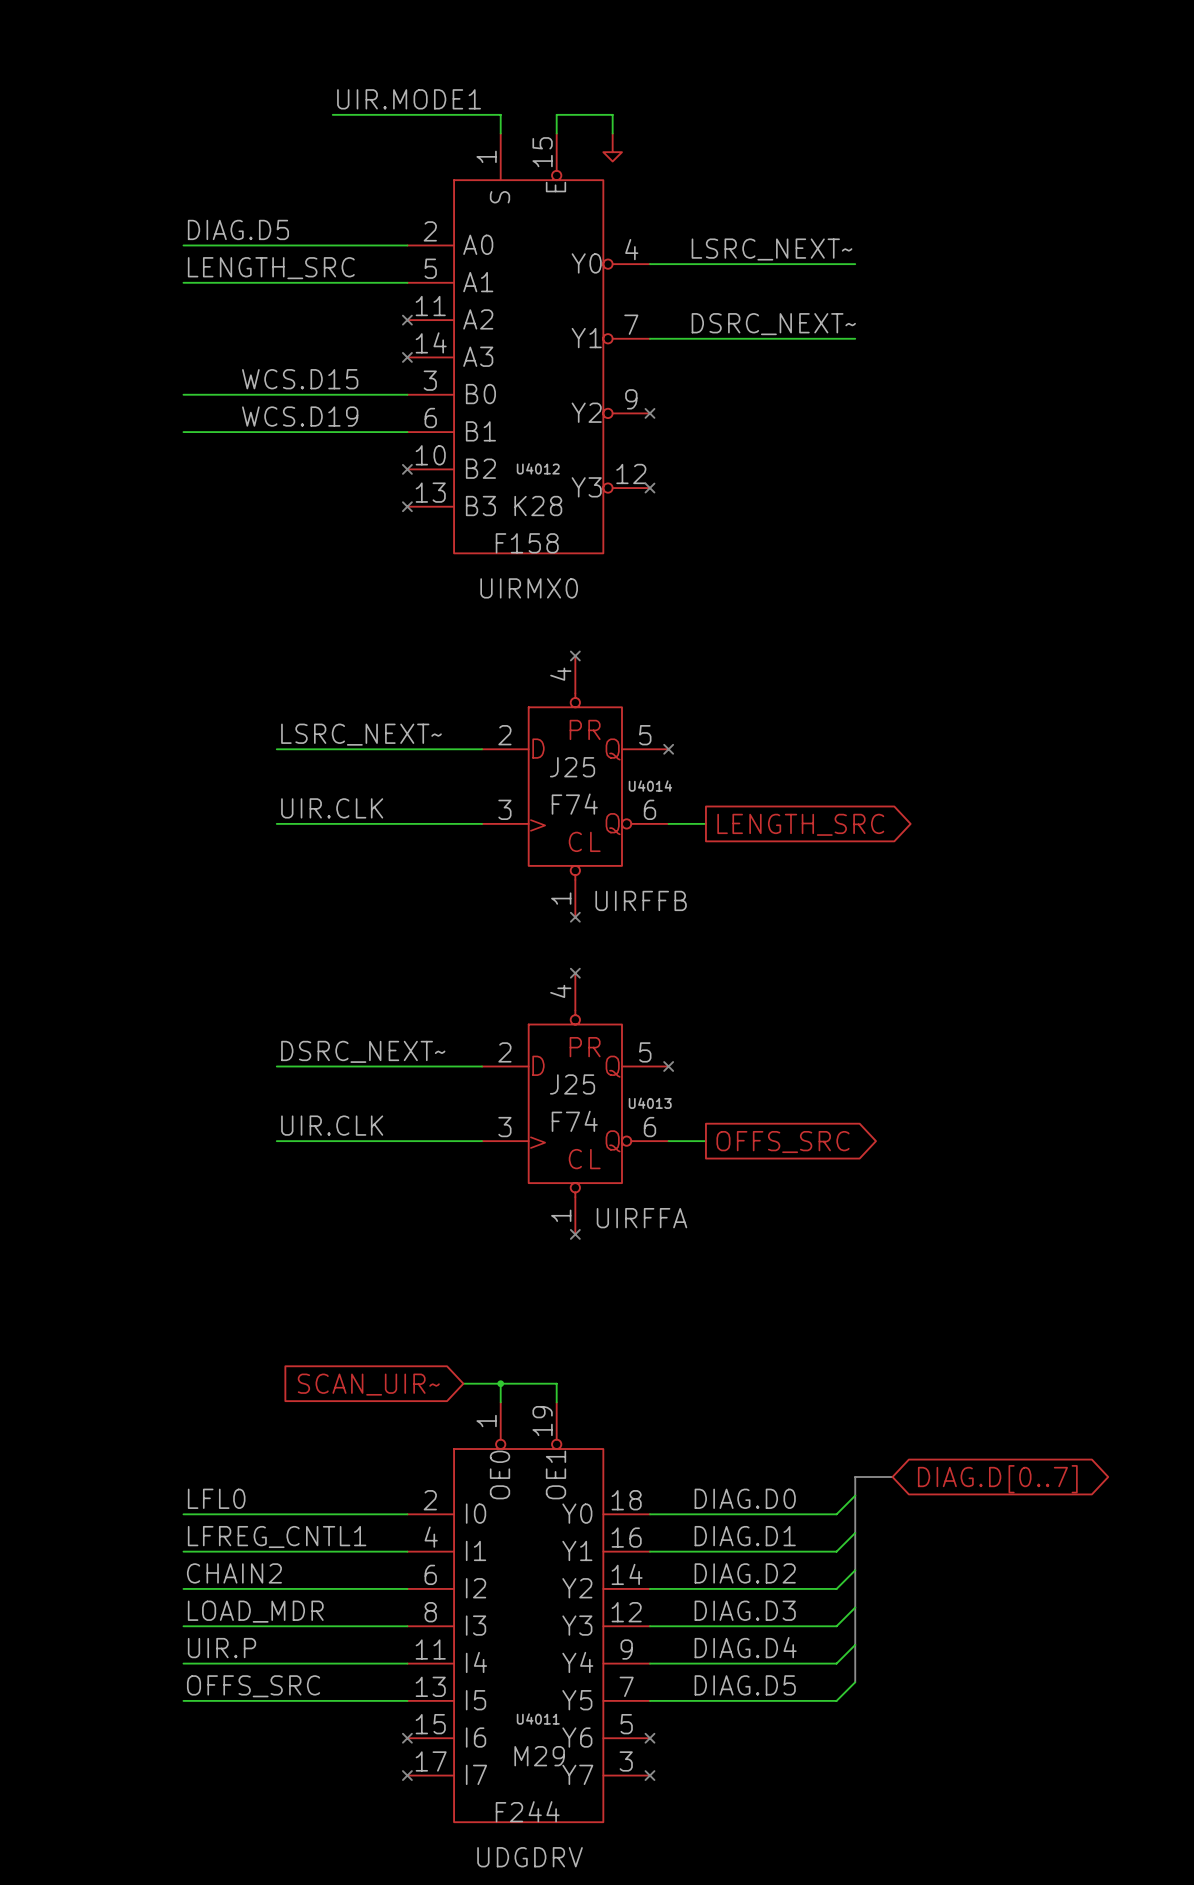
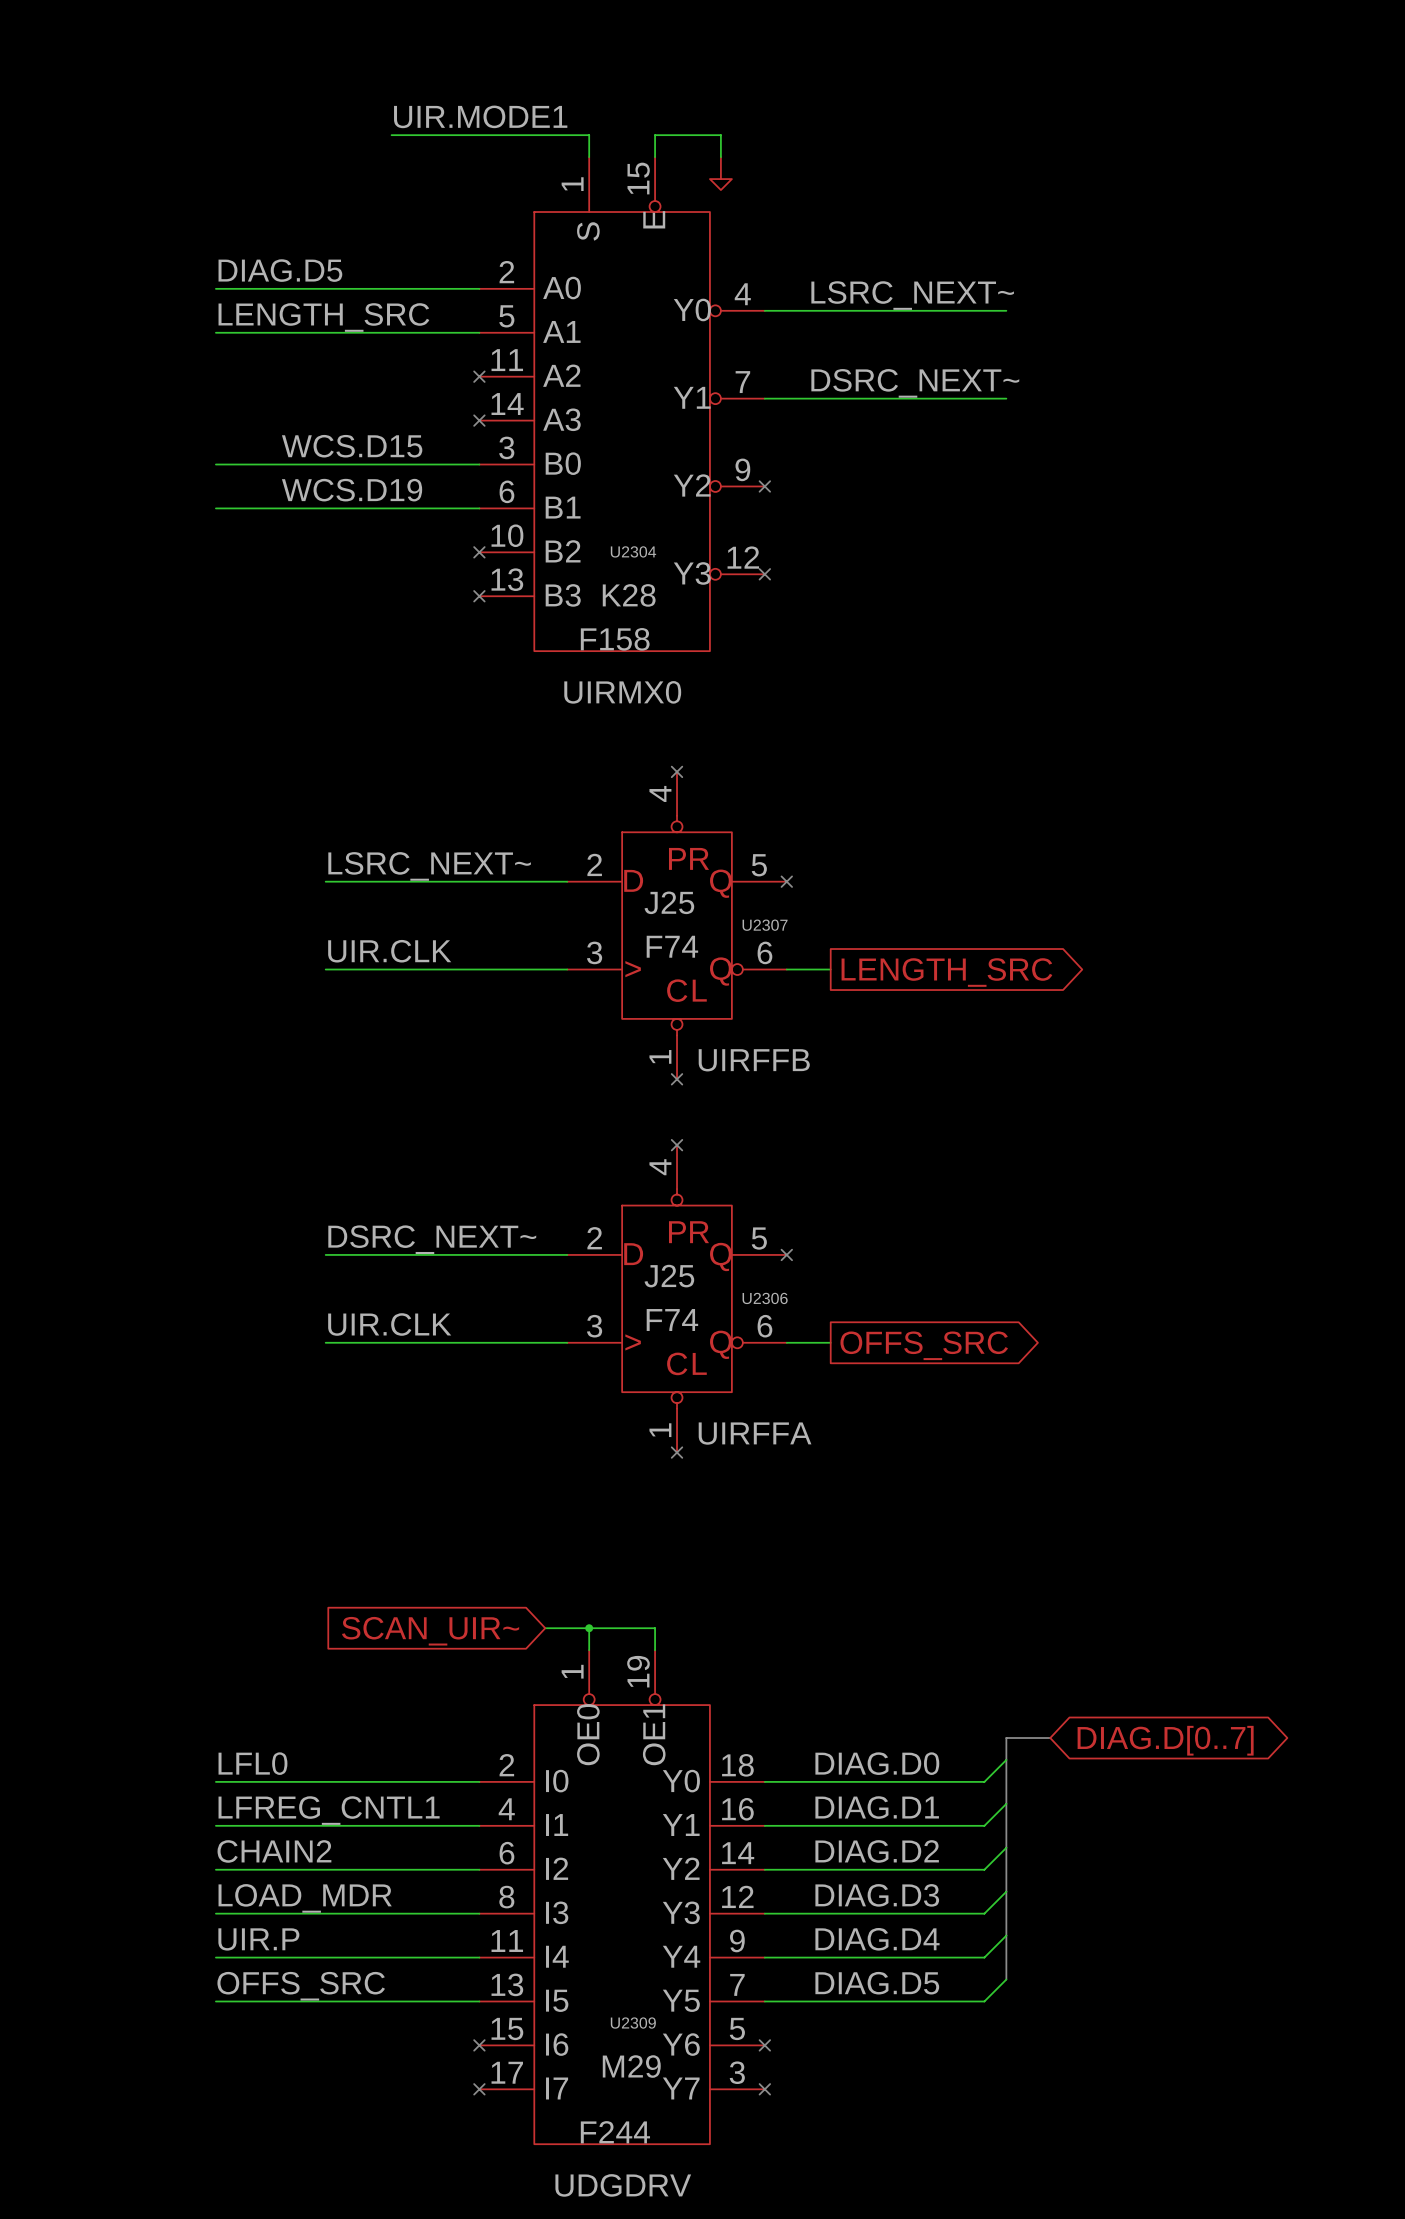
U4012 name: U4012 (538, 468) -> U2304 (633, 551)
U4014 name: U4014 (650, 786) -> U2307 (765, 925)
U4013 name: U4013 (650, 1103) -> U2306 (765, 1298)
U4011 name: U4011 (538, 1719) -> U2309 (633, 2023)

